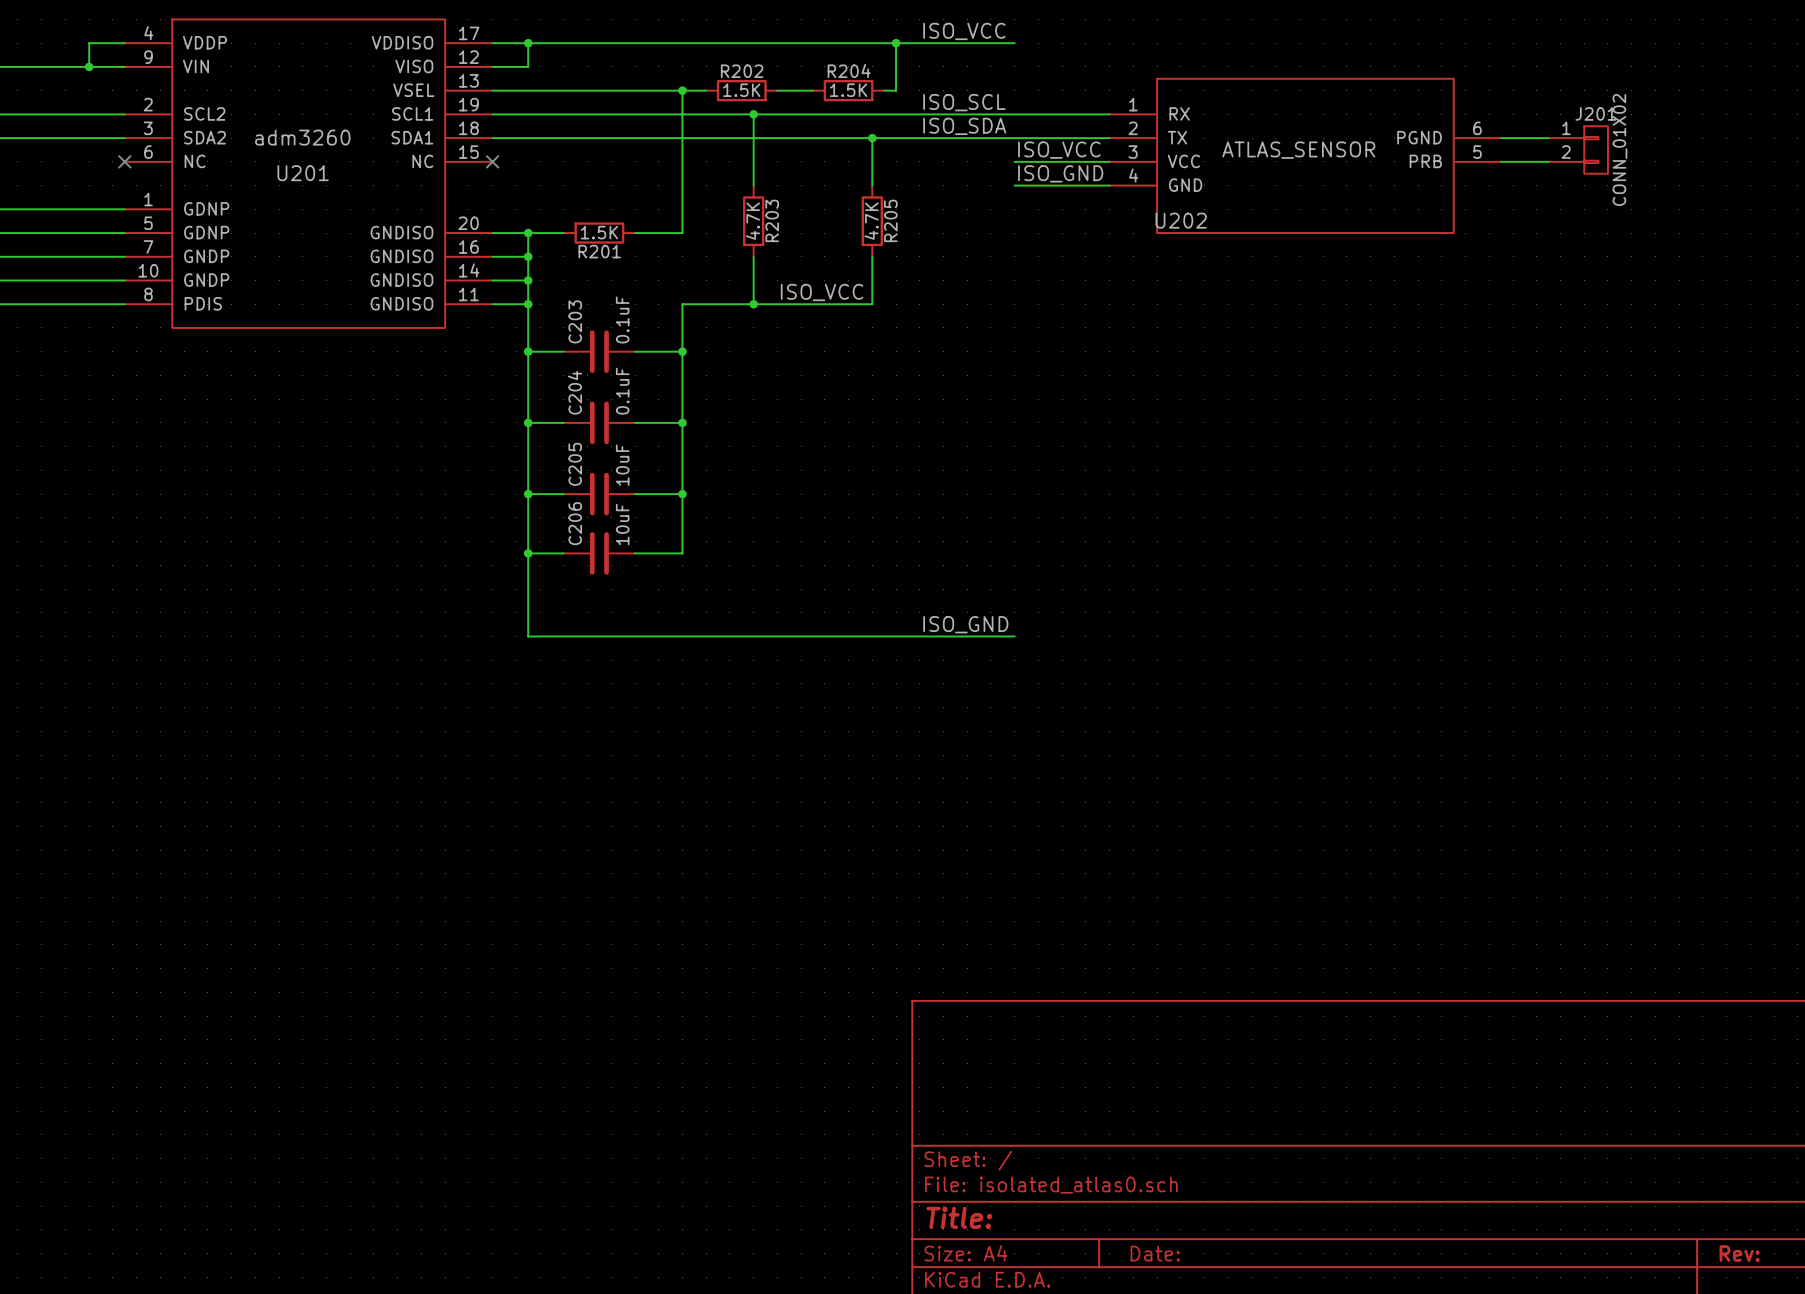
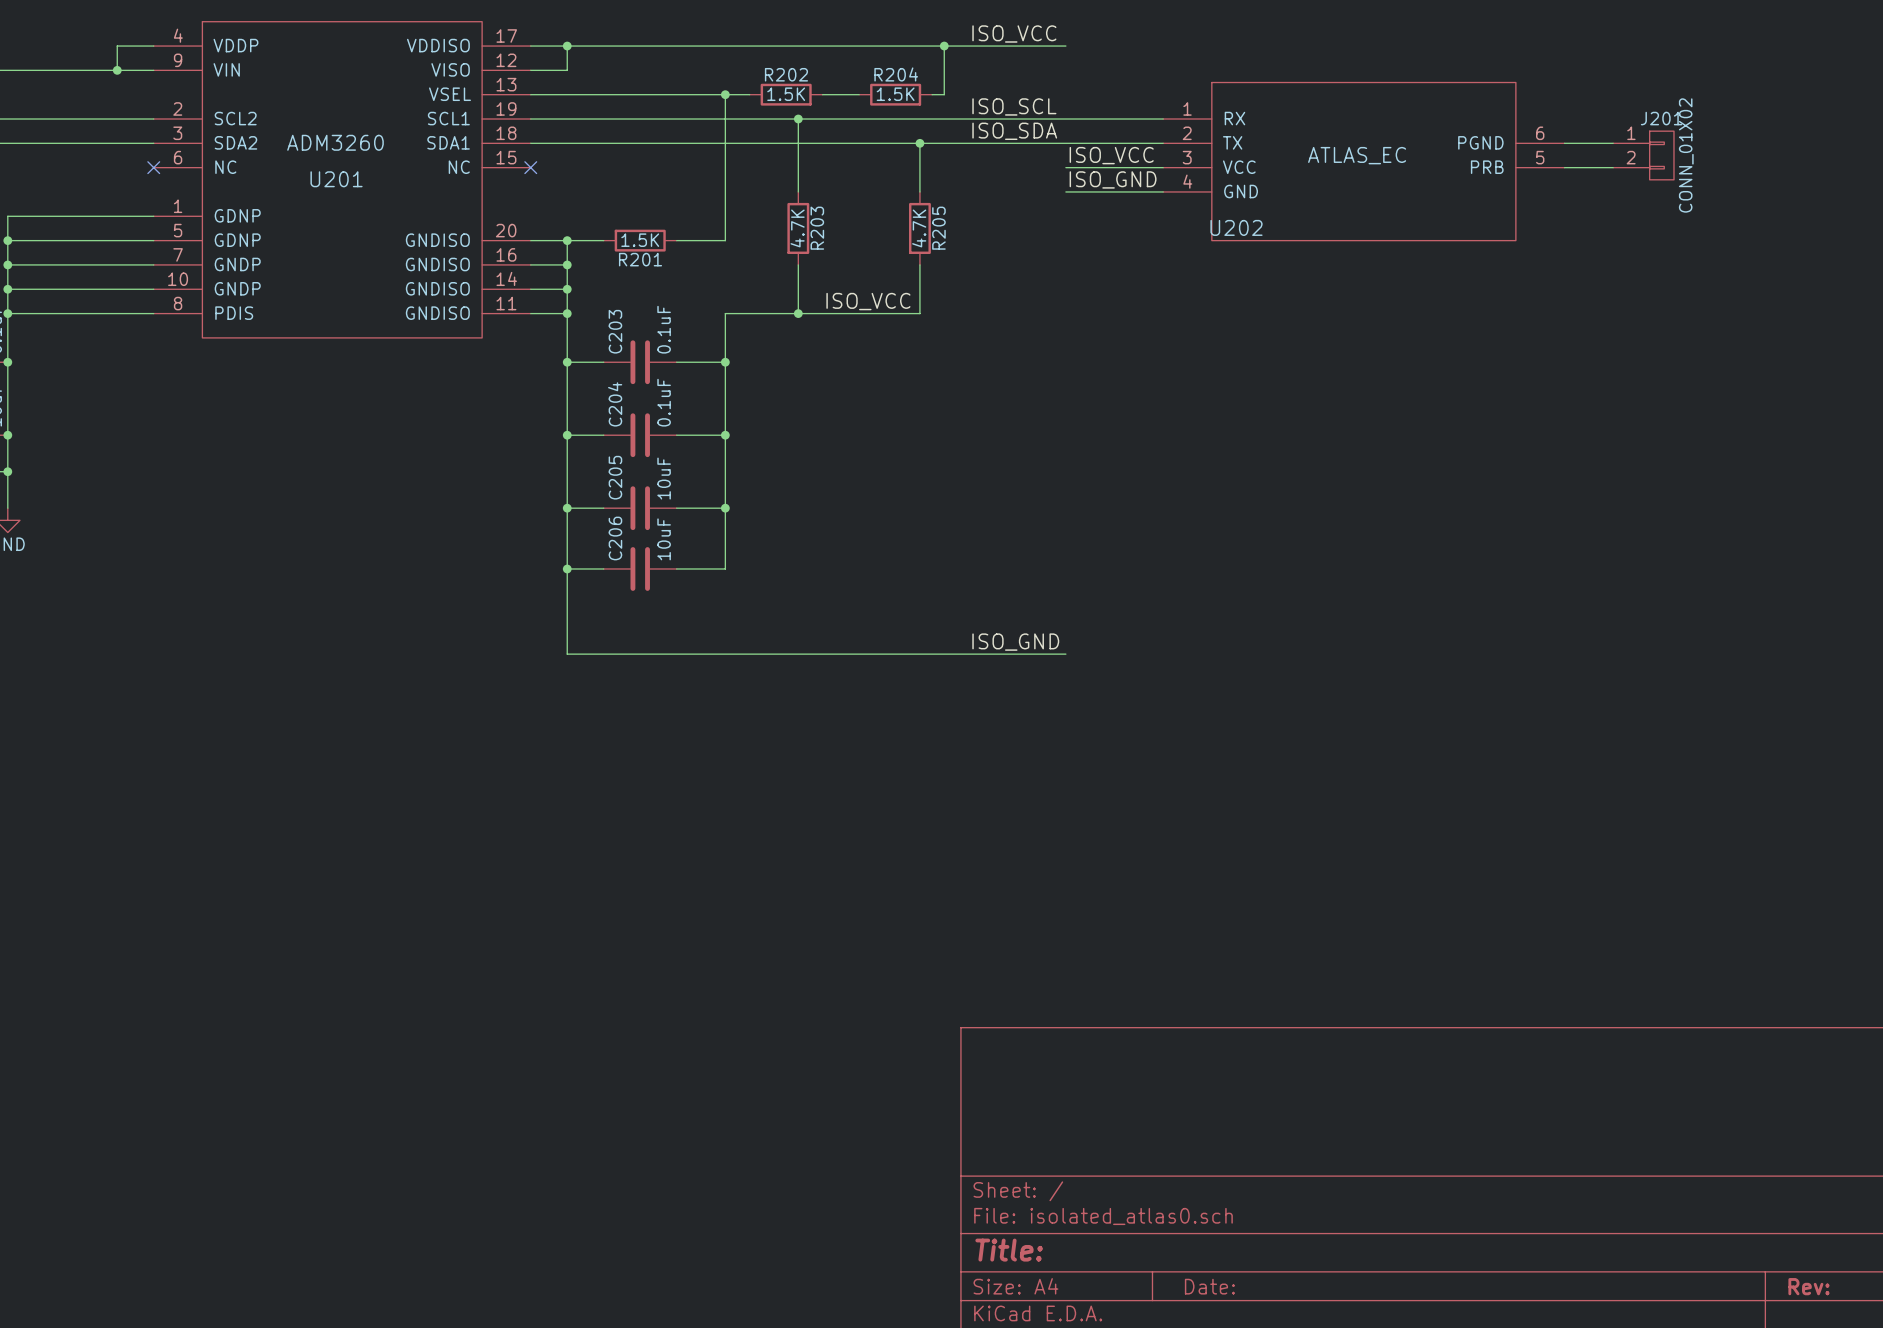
U201 value: adm3260 (302, 137) -> ADM3260 (335, 142)
U202 value: ATLAS_SENSOR (1298, 150) -> ATLAS_EC (1357, 155)

